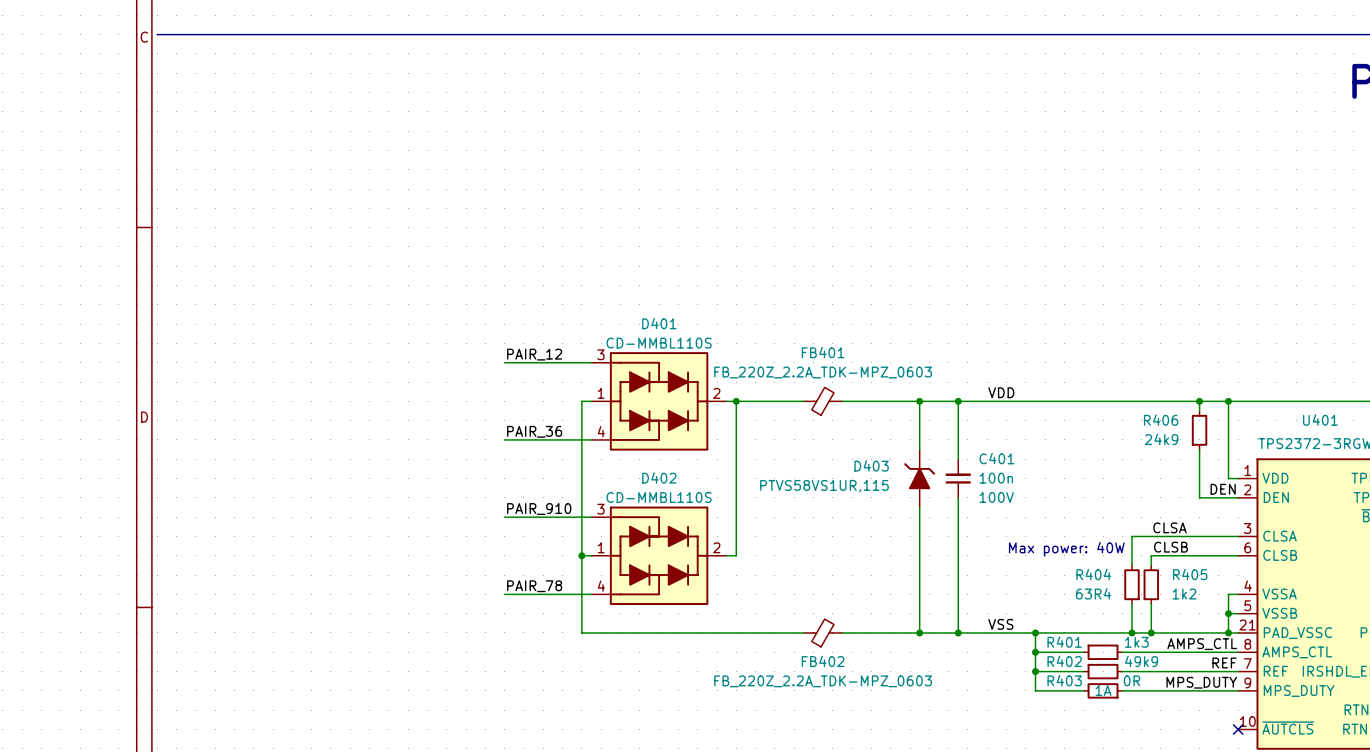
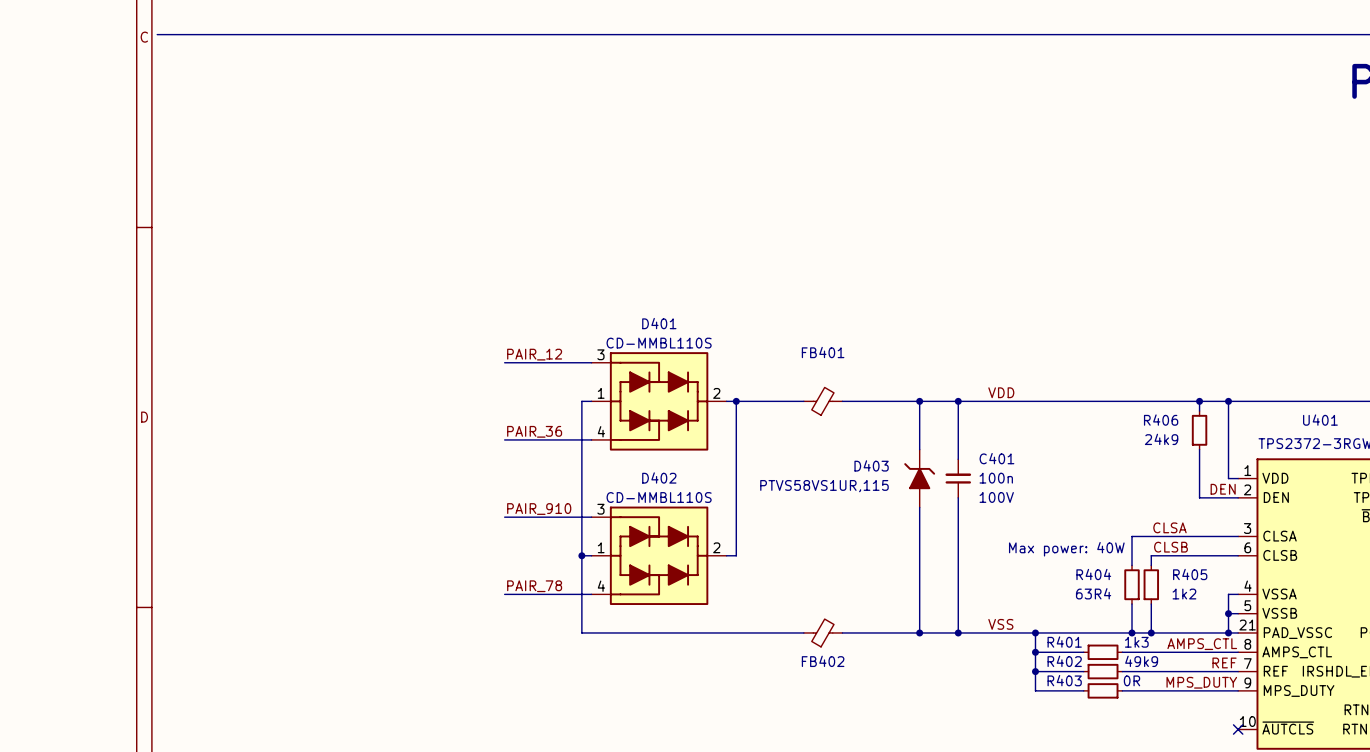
FB401 value: FB_220Z_2.2A_TDK-MPZ_0603 (823, 372) -> none
FB402 value: FB_220Z_2.2A_TDK-MPZ_0603 (823, 681) -> none
R403 text: 1A (1103, 690) -> none

